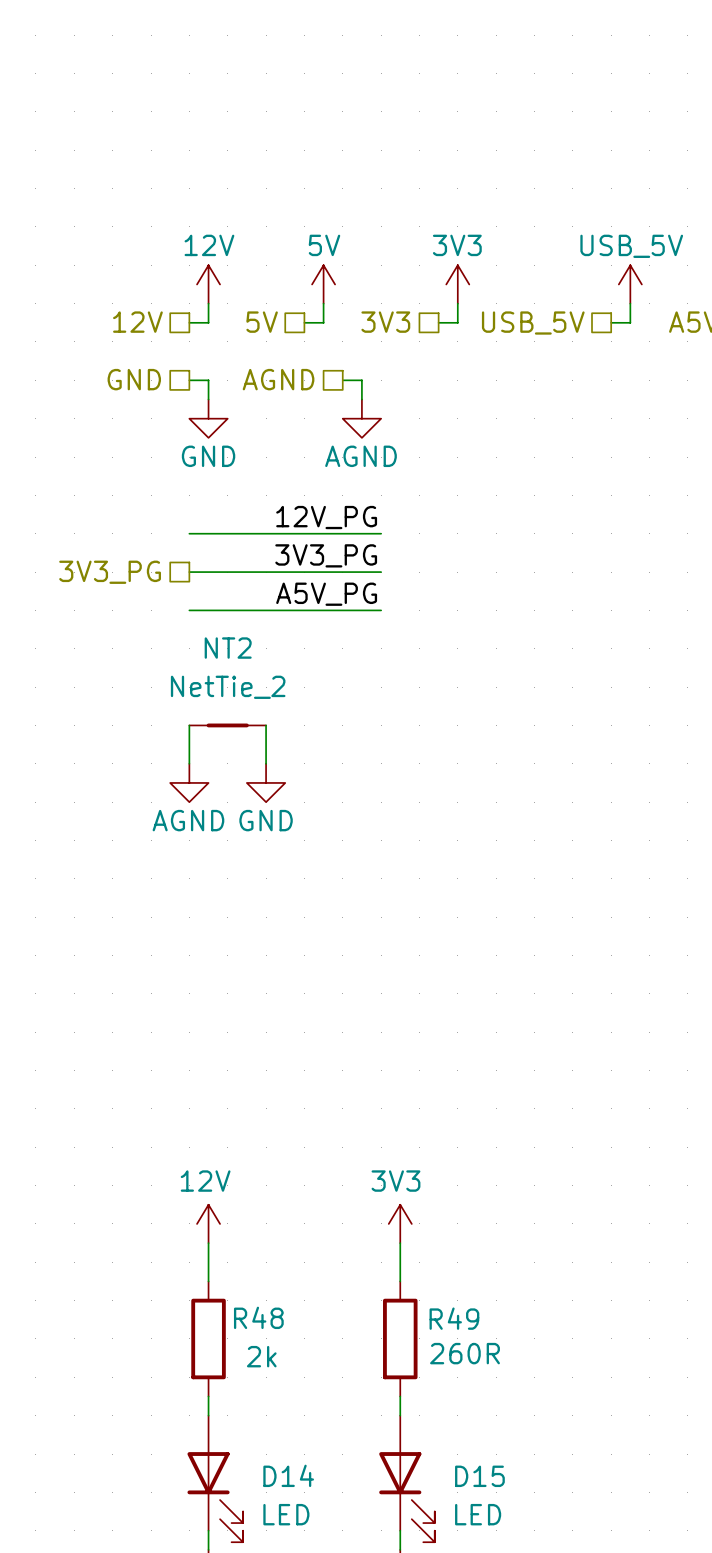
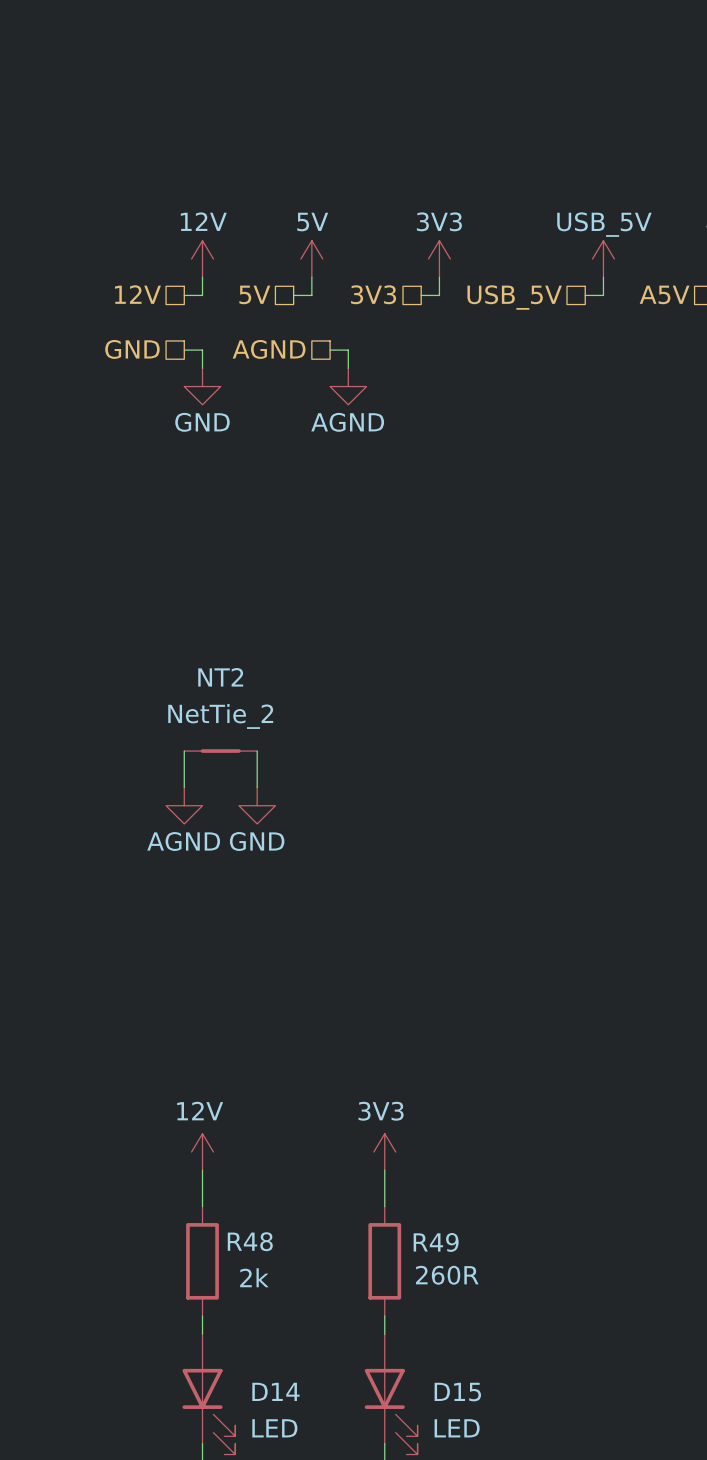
label: 12V_PG (326, 517) -> none
wire: (189, 533) (381, 533) -> none
label: 3V3_PG (326, 555) -> none
hierarchical label: 3V3_PG (110, 572) -> none
wire: (189, 572) (381, 572) -> none
label: A5V_PG (326, 594) -> none
wire: (189, 610) (381, 610) -> none
wire: (189, 725) (189, 763) -> (184, 751) (184, 787)
NT2 position: (227, 725) -> (220, 751)
wire: (266, 725) (266, 763) -> (257, 751) (257, 787)
power symbol position: AGND (189, 782) -> AGND (184, 805)
power symbol position: GND (266, 782) -> GND (257, 805)

